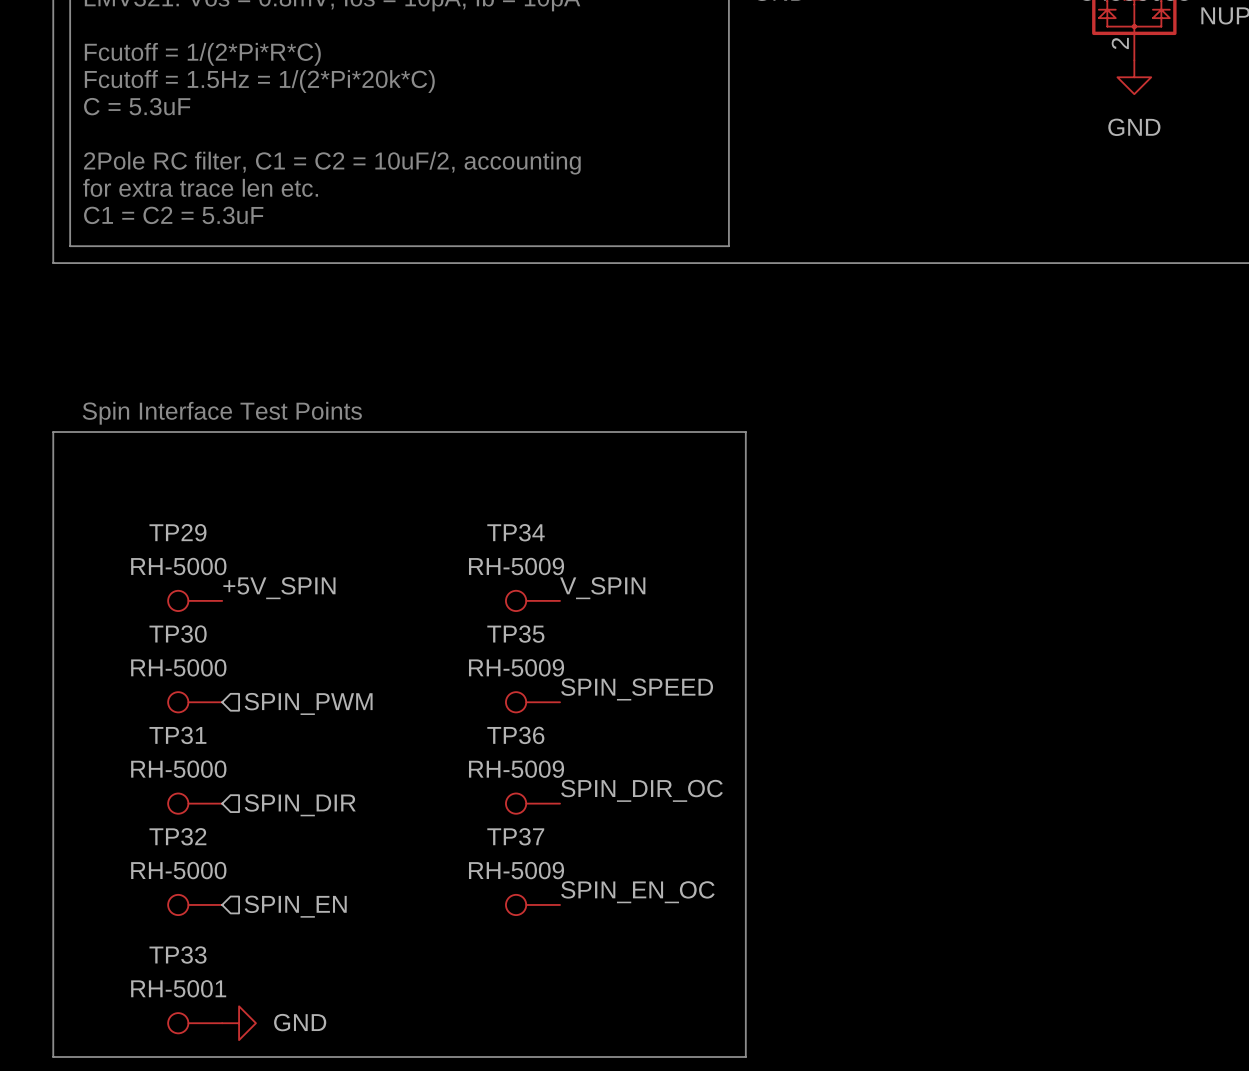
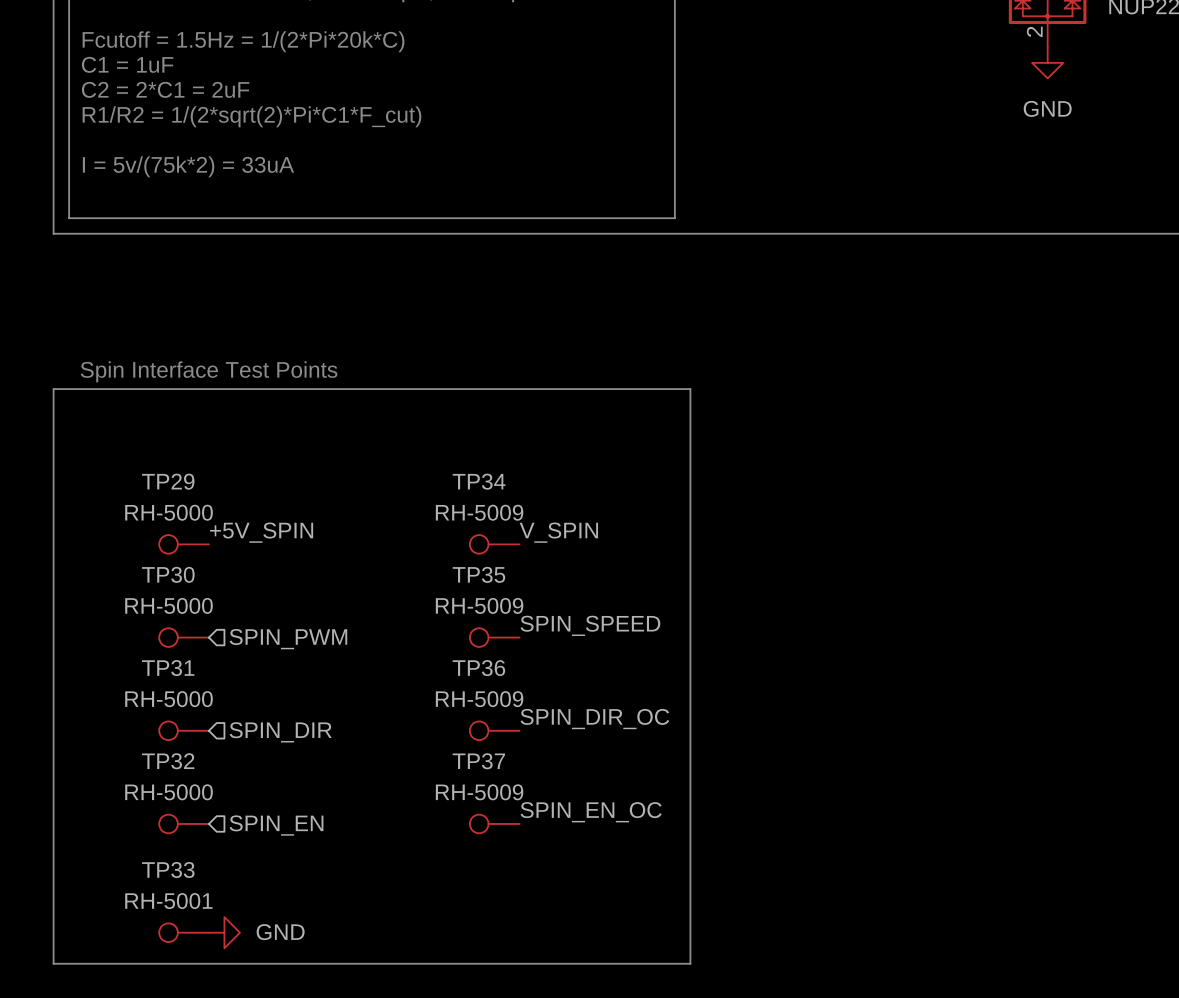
text: Fcutoff = 1/(2*Pi*R*C) (202, 54) -> Fcutoff = 1.5Hz = 1/(2*Pi*20k*C) (243, 41)
text: Fcutoff = 1.5Hz = 1/(2*Pi*20k*C) (259, 81) -> C1 = 1uF (127, 64)
text: C = 5.3uF (137, 106) -> C2 = 2*C1 = 2uF (165, 89)
text: none -> R1/R2 = 1/(2*sqrt(2)*Pi*C1*F_cut) (251, 116)
text: 2Pole RC filter, C1 = C2 = 10uF/2, accounting (332, 163) -> none
text: for extra trace len etc. (200, 187) -> I = 5v/(75k*2) = 33uA (188, 166)
text: C1 = C2 = 5.3uF (173, 215) -> none

